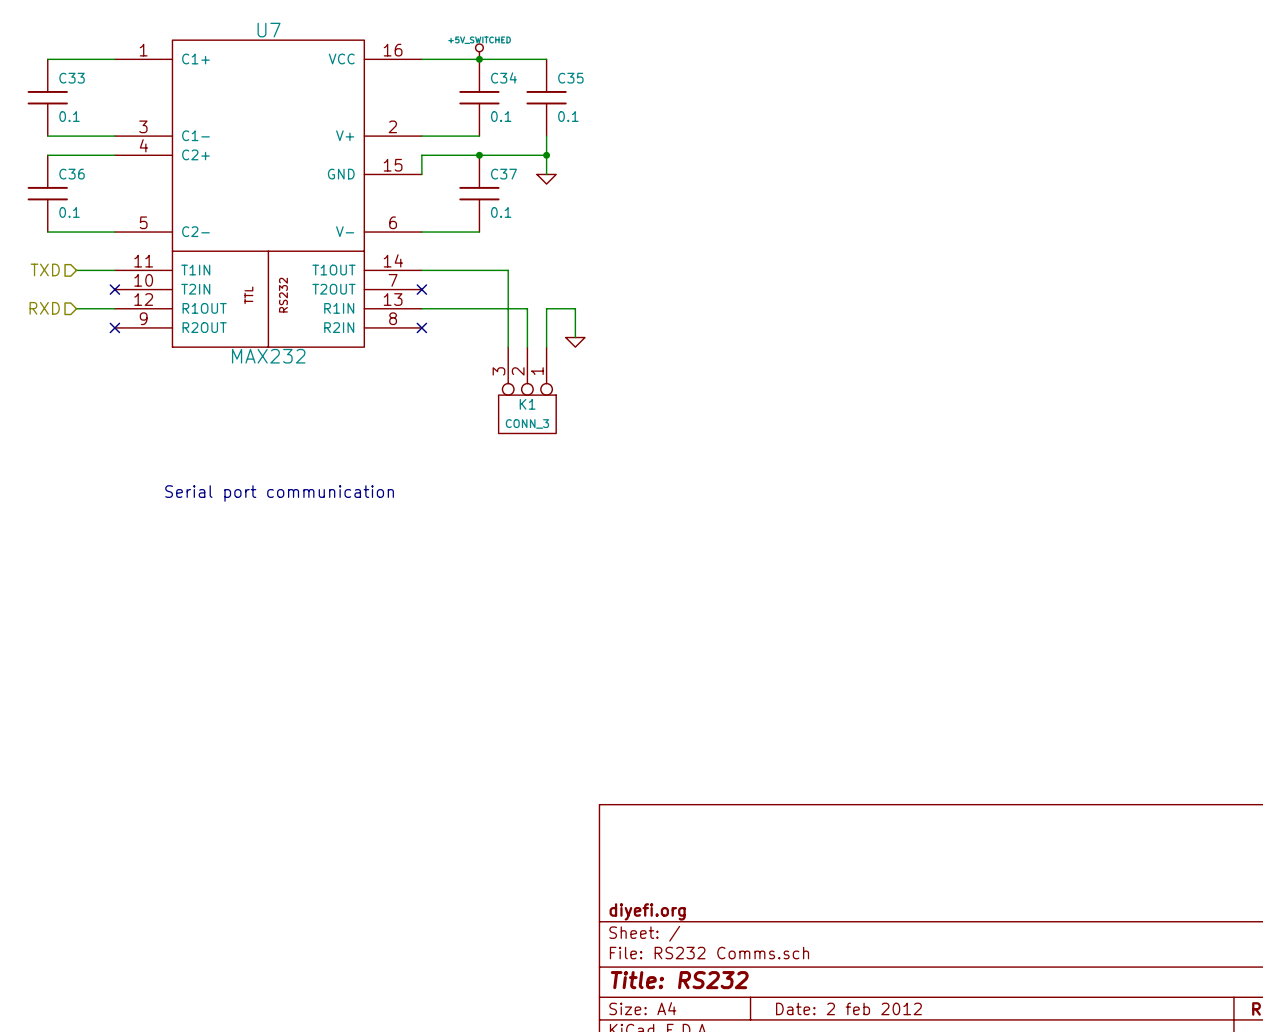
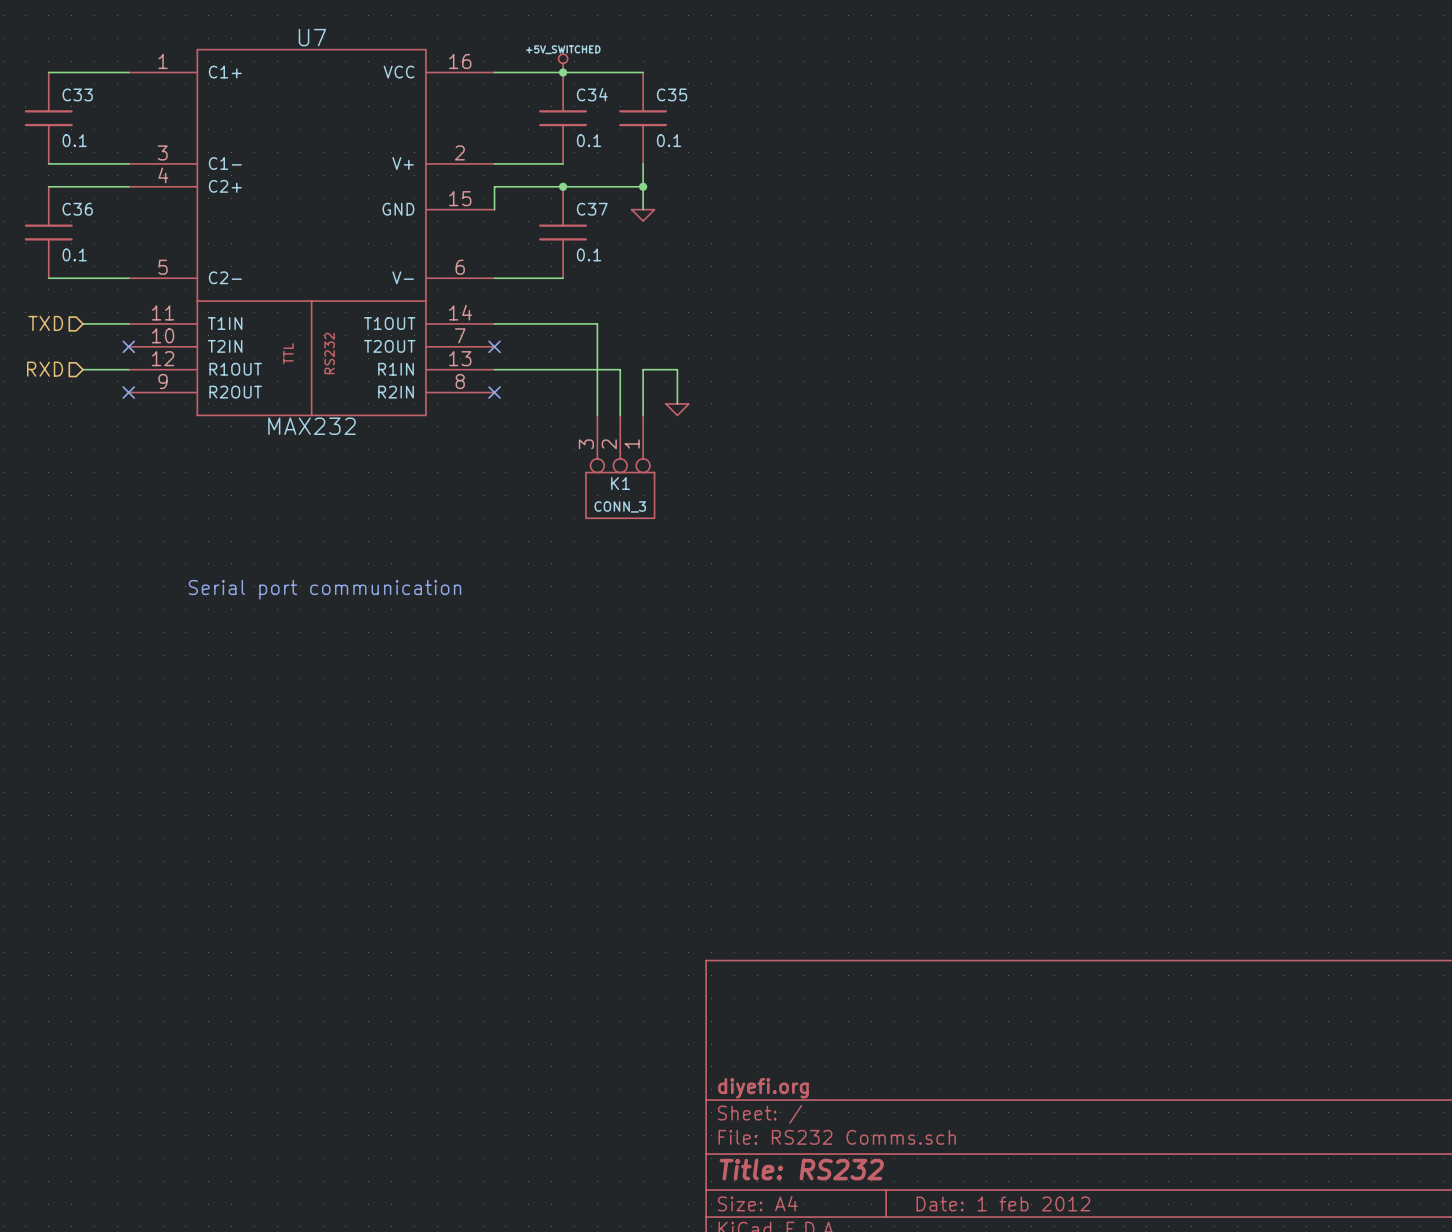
title block: Date: 2 feb 2012 (848, 1008) -> Date: 1 feb 2012 (1003, 1203)

